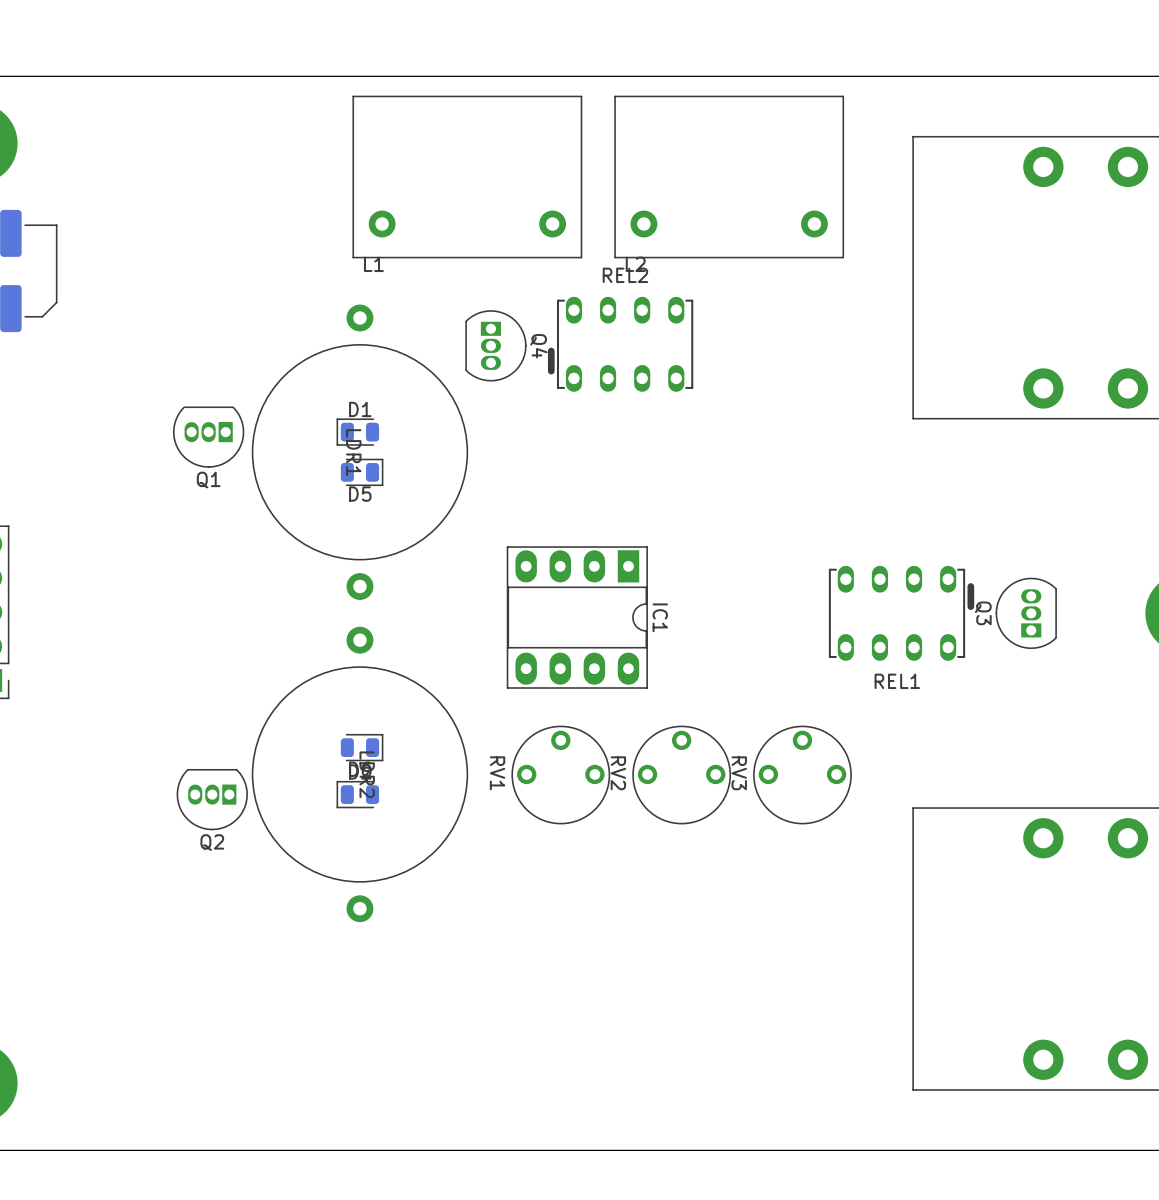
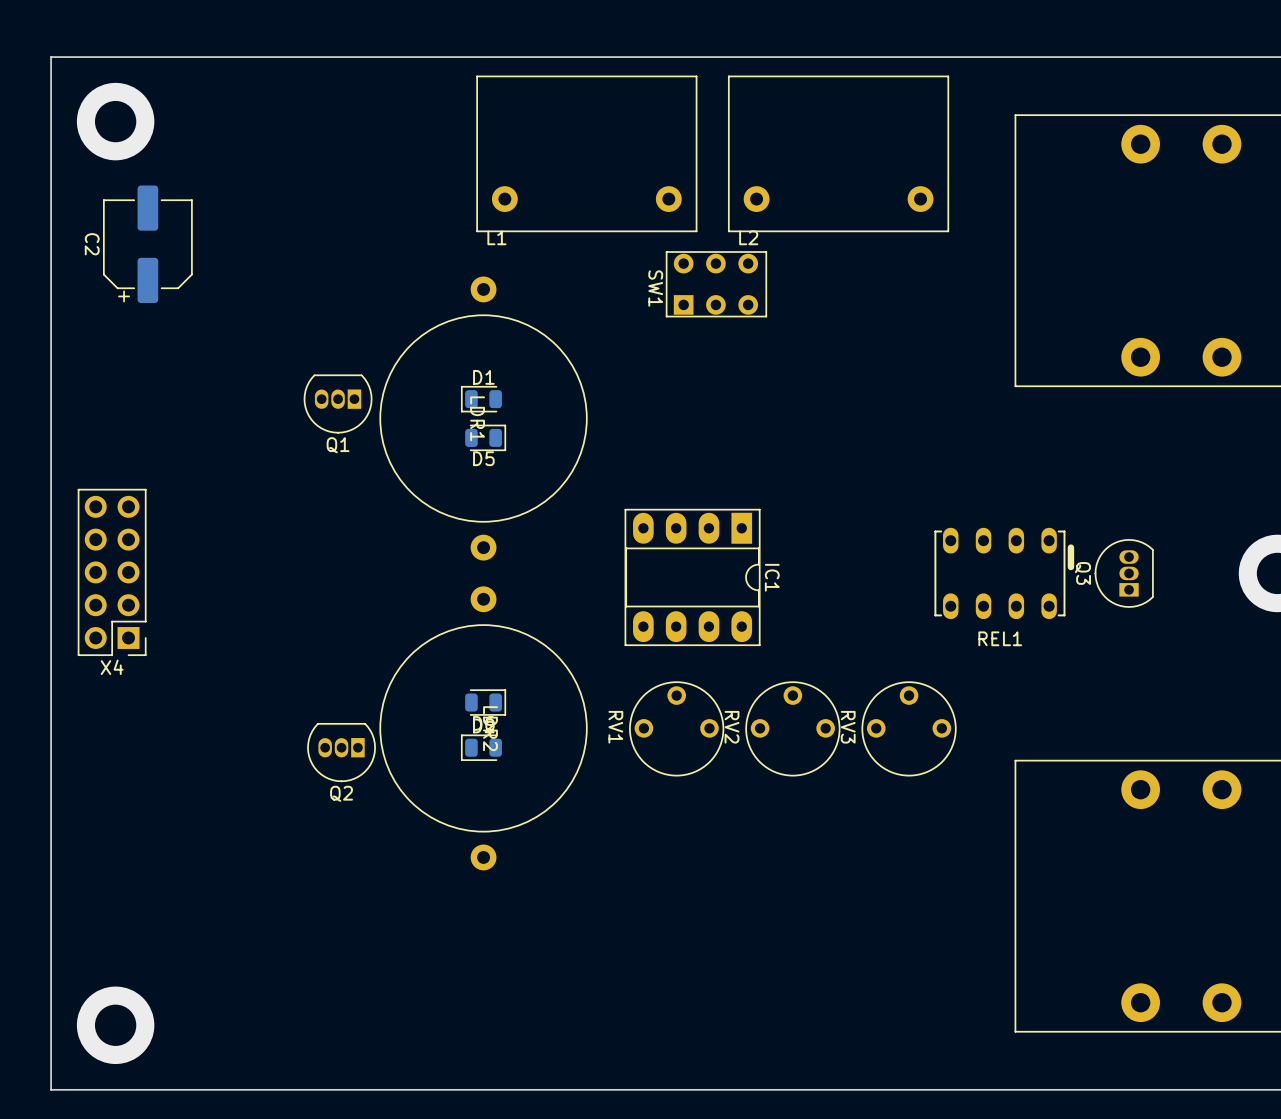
SW1: none -> (716, 284)
REL2: (620, 344) -> none
Q4: (495, 345) -> none

